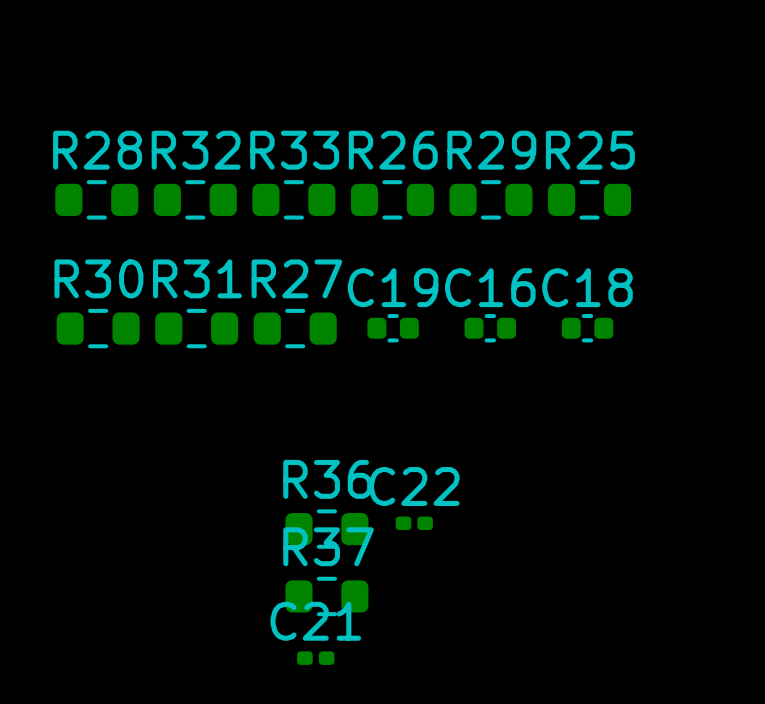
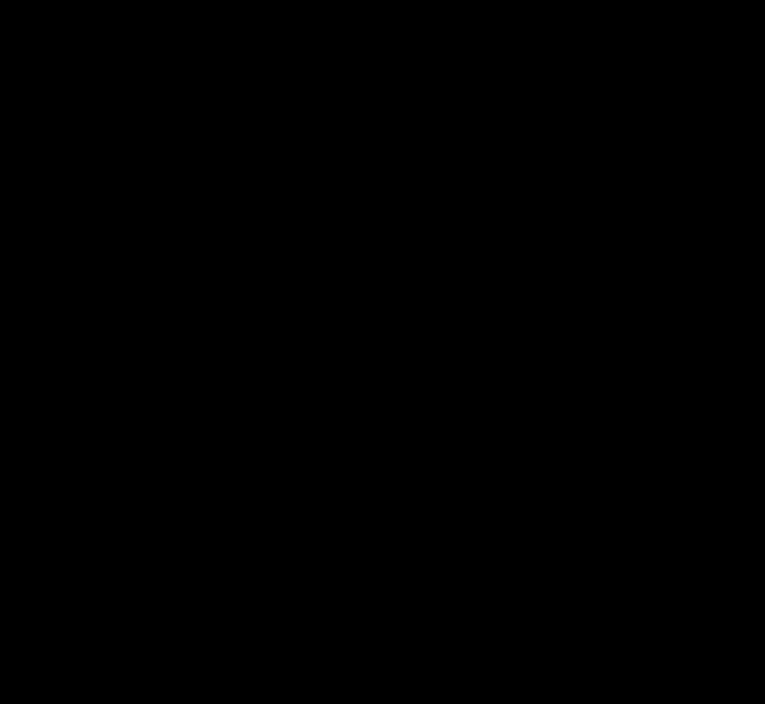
R28: (96, 199) -> none
R32: (195, 199) -> none
R33: (293, 199) -> none
R26: (392, 199) -> none
R29: (490, 199) -> none
R25: (589, 199) -> none
R30: (98, 328) -> none
R31: (196, 328) -> none
R27: (295, 328) -> none
C19: (393, 328) -> none
C16: (490, 328) -> none
C18: (587, 328) -> none
C22: (414, 523) -> none
R36: (326, 529) -> none
R37: (326, 596) -> none
C21: (315, 658) -> none

